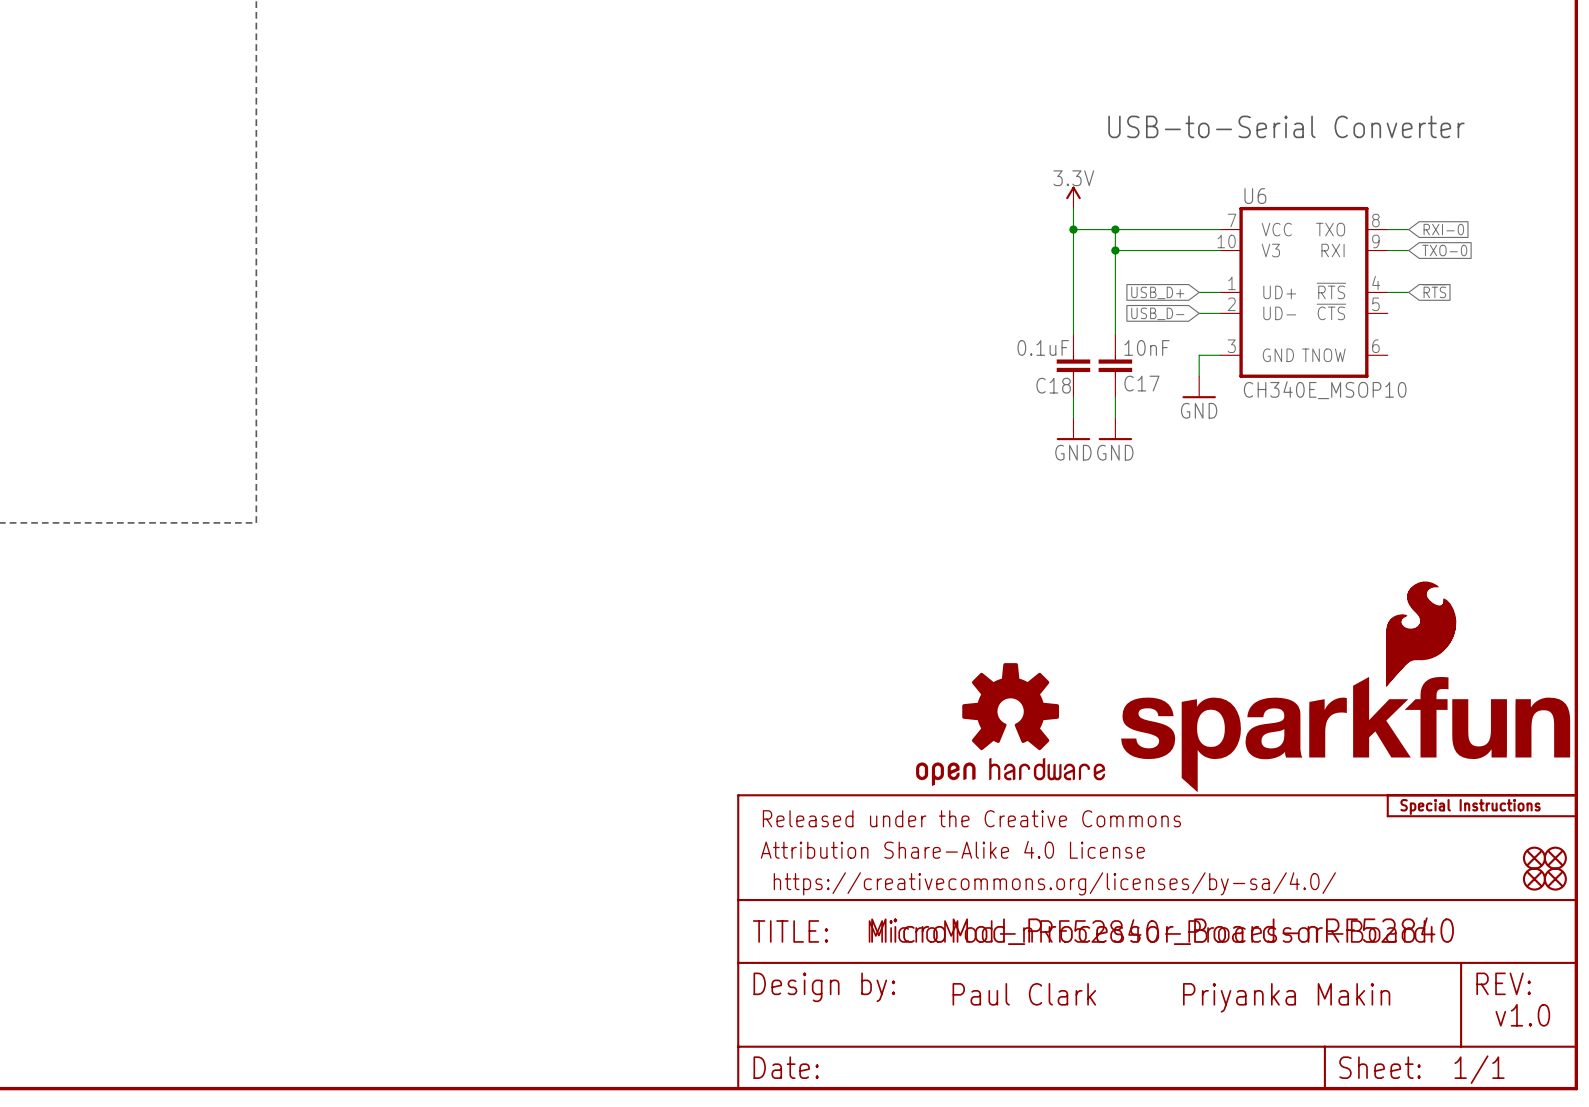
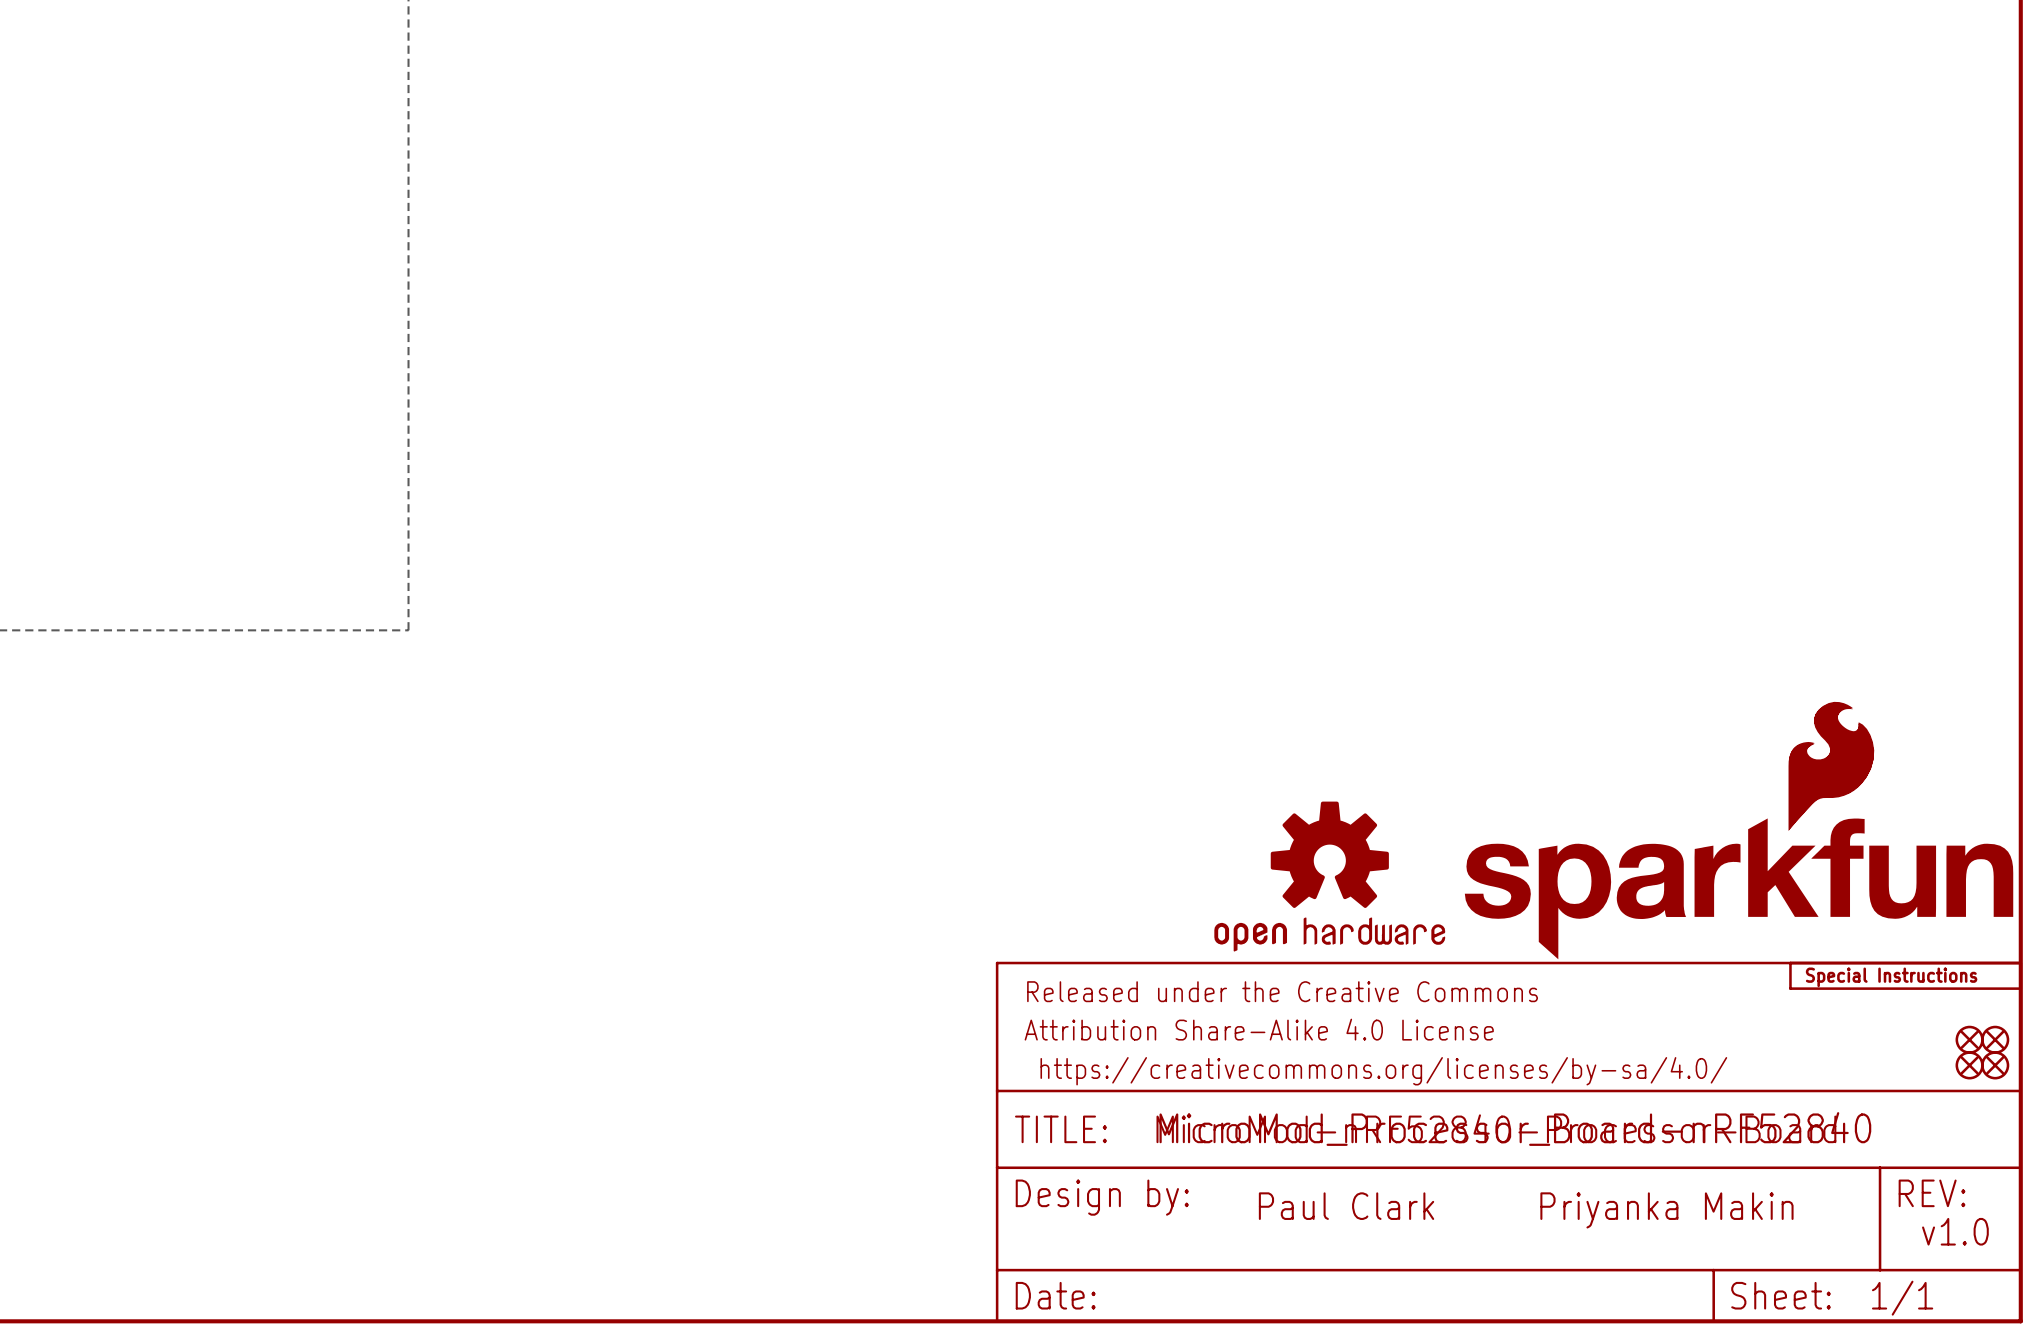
text: USB-to-Serial Converter (1286, 126) -> none
power symbol: 3.3V (1073, 197) -> none
wire: (1073, 208) (1073, 334) -> none
wire: (1073, 229) (1220, 229) -> none
junction: (1073, 229) -> none
wire: (1115, 229) (1115, 334) -> none
junction: (1115, 229) -> none
wire: (1387, 229) (1408, 229) -> none
global label: RXI-0 (1443, 229) -> none
wire: (1115, 250) (1220, 250) -> none
junction: (1115, 250) -> none
wire: (1387, 250) (1408, 250) -> none
global label: TXO-0 (1444, 250) -> none
global label: ~{RTS} (1434, 291) -> none
global label: USB_D+ (1157, 292) -> none
wire: (1199, 292) (1220, 292) -> none
U6: CH340E_MSOP10 (1303, 292) -> none
wire: (1387, 292) (1408, 292) -> none
global label: USB_D- (1157, 313) -> none
wire: (1199, 313) (1220, 313) -> none
wire: (1220, 355) (1199, 355) (1199, 376) -> none
C18: 0.1uF (1073, 365) -> none
C17: 10nF (1115, 365) -> none
power symbol: GND (1199, 387) -> none
wire: (1073, 397) (1073, 418) -> none
wire: (1115, 397) (1115, 418) -> none
power symbol: GND (1073, 429) -> none
power symbol: GND (1115, 429) -> none

